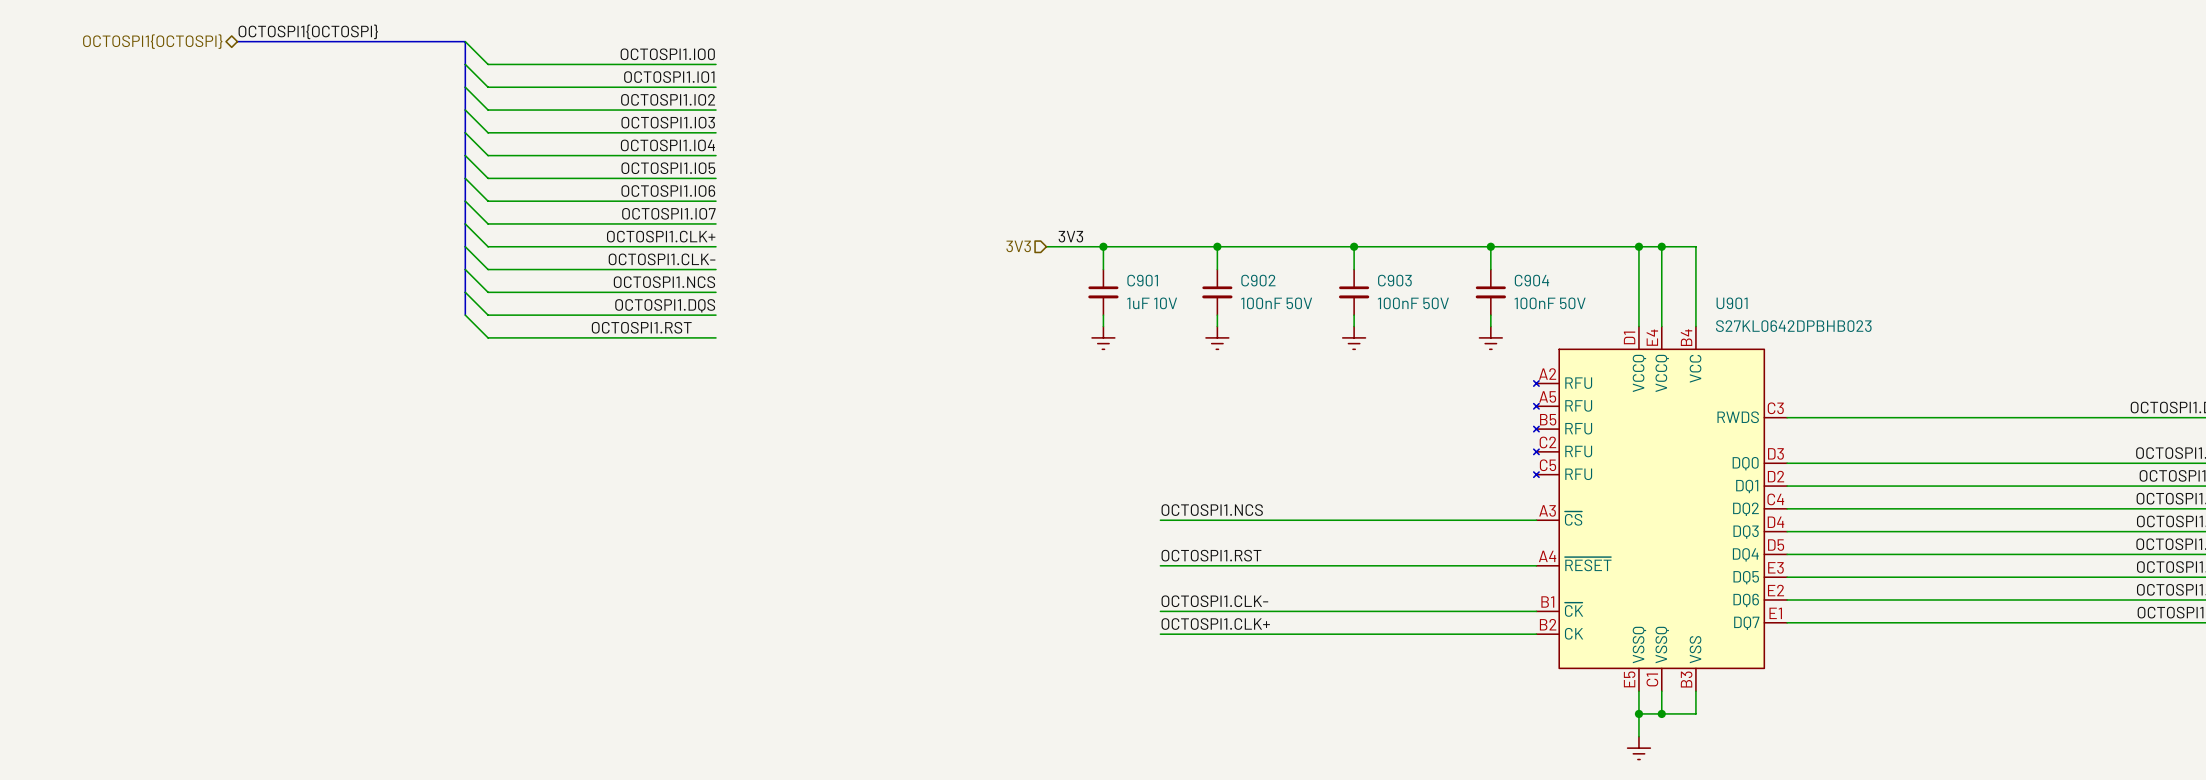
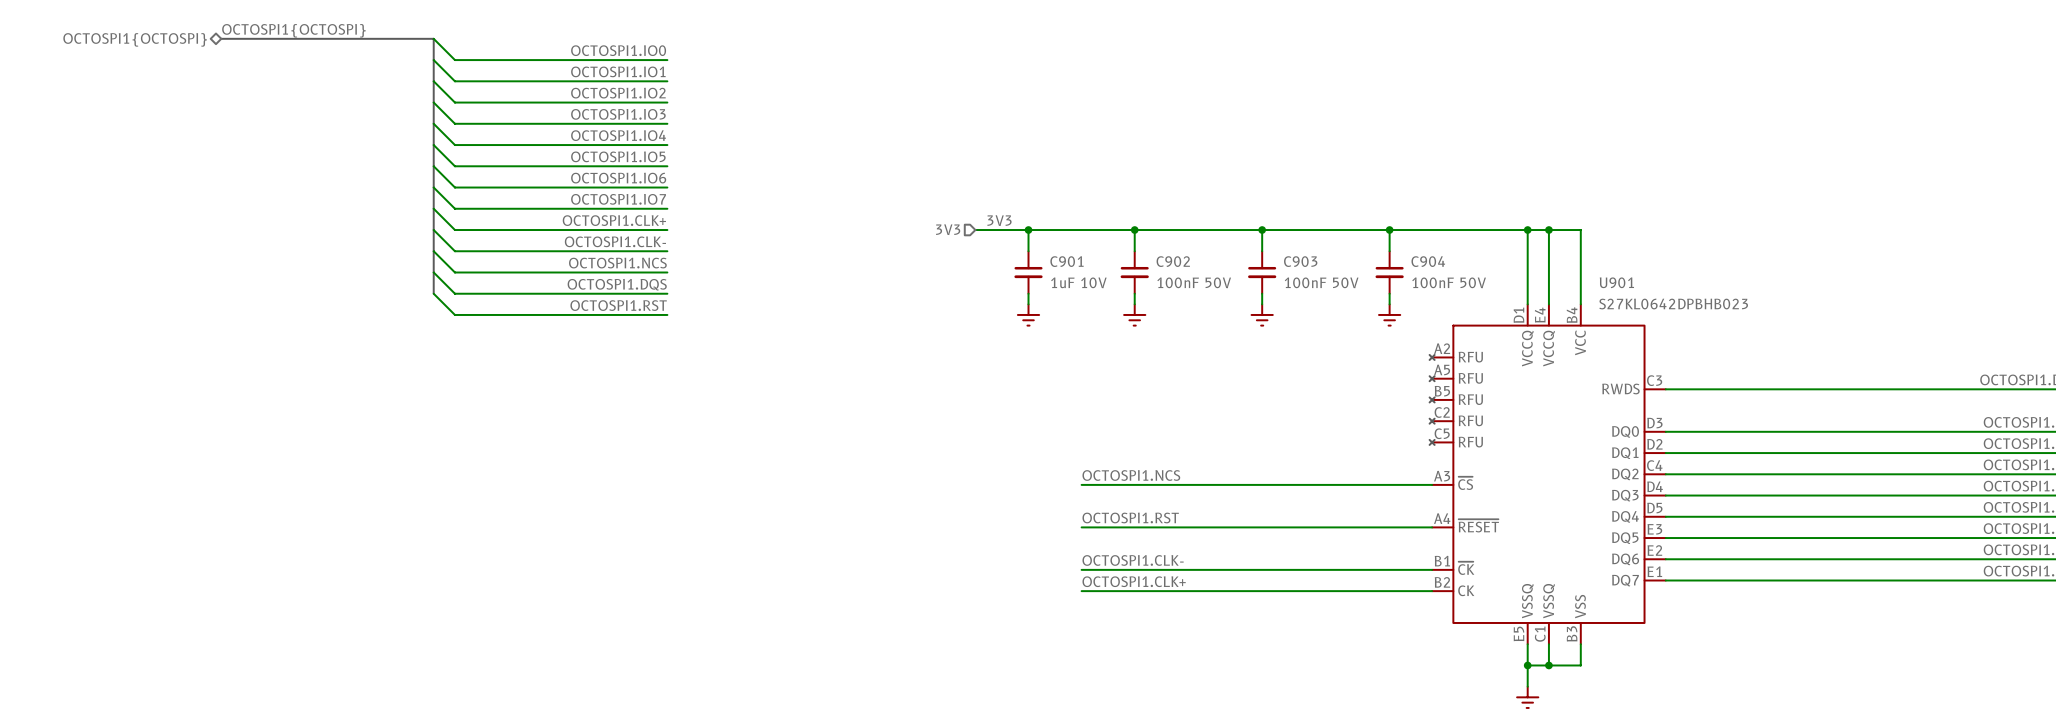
label position: OCTOSPI1.RST (641, 327) -> OCTOSPI1.RST (618, 305)

